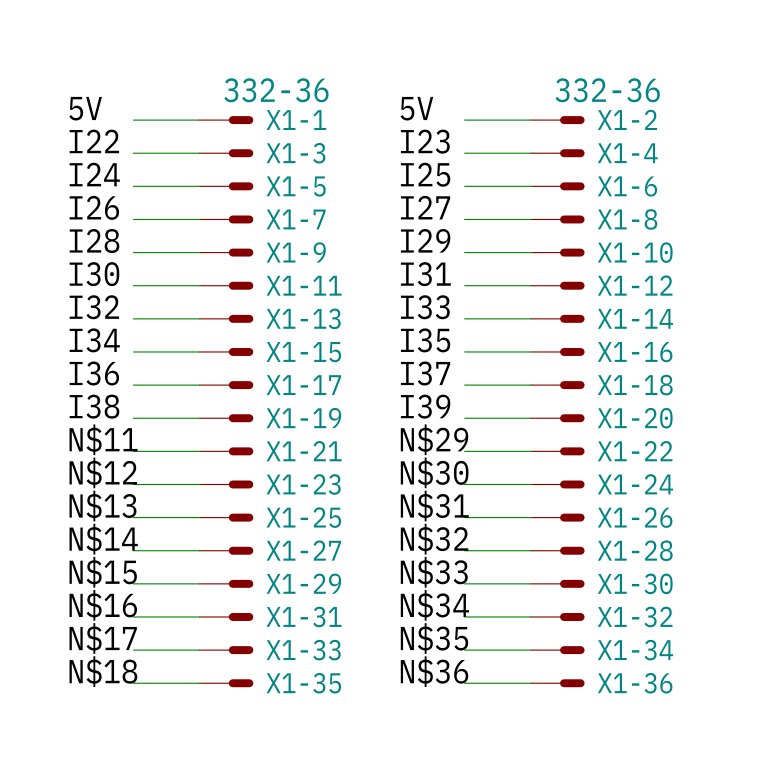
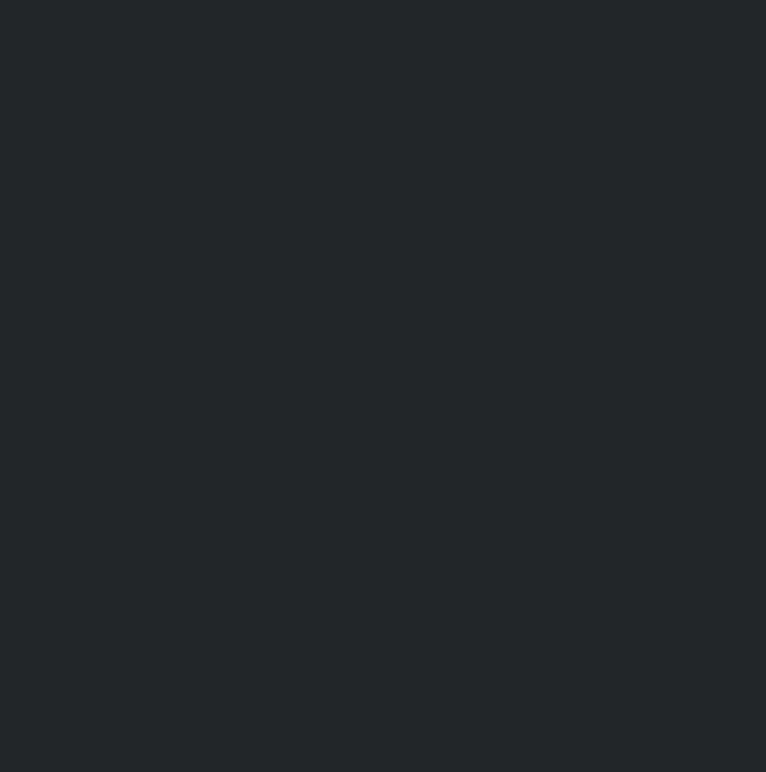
label: 5V (85, 108) -> none
label: 5V (416, 108) -> none
wire: (133, 120) (199, 120) -> none
X1-1: 332-36 (226, 120) -> none
wire: (464, 120) (530, 120) -> none
X1-2: 332-36 (557, 120) -> none
label: I22 (94, 141) -> none
label: I23 (425, 141) -> none
wire: (133, 153) (199, 153) -> none
X1-3: (226, 153) -> none
wire: (464, 153) (530, 153) -> none
X1-4: (557, 153) -> none
label: I24 (94, 174) -> none
label: I25 (425, 174) -> none
wire: (133, 186) (199, 186) -> none
X1-5: (226, 186) -> none
wire: (464, 186) (530, 186) -> none
X1-6: (557, 186) -> none
label: I26 (94, 207) -> none
label: I27 (425, 207) -> none
wire: (133, 219) (199, 219) -> none
X1-7: (226, 219) -> none
wire: (464, 219) (530, 219) -> none
X1-8: (557, 219) -> none
label: I29 (425, 240) -> none
label: I28 (94, 241) -> none
wire: (133, 252) (199, 252) -> none
X1-9: (226, 252) -> none
wire: (464, 252) (530, 252) -> none
X1-10: (557, 252) -> none
label: I30 (94, 274) -> none
label: I31 (425, 274) -> none
wire: (133, 285) (199, 285) -> none
X1-11: (226, 285) -> none
wire: (464, 285) (530, 285) -> none
X1-12: (557, 285) -> none
label: I32 (94, 307) -> none
label: I33 (425, 307) -> none
wire: (133, 318) (199, 318) -> none
X1-13: (226, 318) -> none
wire: (464, 318) (530, 318) -> none
X1-14: (557, 318) -> none
label: I34 (94, 340) -> none
label: I35 (425, 340) -> none
wire: (133, 351) (199, 351) -> none
X1-15: (226, 351) -> none
wire: (464, 351) (530, 351) -> none
X1-16: (557, 351) -> none
label: I36 (94, 373) -> none
label: I37 (425, 373) -> none
wire: (133, 385) (199, 385) -> none
X1-17: (226, 385) -> none
wire: (464, 385) (530, 385) -> none
X1-18: (557, 385) -> none
label: I38 (94, 406) -> none
label: I39 (425, 406) -> none
wire: (133, 418) (199, 418) -> none
X1-19: (226, 418) -> none
wire: (464, 418) (530, 418) -> none
X1-20: (557, 418) -> none
label: N$11 (103, 439) -> none
label: N$29 (434, 439) -> none
wire: (133, 451) (199, 451) -> none
X1-21: (226, 451) -> none
wire: (464, 451) (530, 451) -> none
X1-22: (557, 451) -> none
label: N$12 (103, 472) -> none
label: N$30 (434, 472) -> none
wire: (133, 484) (199, 484) -> none
X1-23: (226, 484) -> none
wire: (464, 484) (530, 484) -> none
X1-24: (557, 484) -> none
label: N$13 (102, 506) -> none
label: N$31 (434, 506) -> none
wire: (133, 517) (199, 517) -> none
X1-25: (226, 517) -> none
wire: (464, 517) (530, 517) -> none
X1-26: (557, 517) -> none
label: N$14 (103, 539) -> none
label: N$32 (434, 539) -> none
wire: (133, 550) (199, 550) -> none
X1-27: (226, 550) -> none
wire: (464, 550) (530, 550) -> none
X1-28: (557, 550) -> none
label: N$15 (103, 572) -> none
label: N$33 (434, 572) -> none
wire: (133, 583) (199, 583) -> none
X1-29: (226, 583) -> none
wire: (464, 583) (530, 583) -> none
X1-30: (557, 583) -> none
label: N$16 (103, 605) -> none
label: N$34 (434, 605) -> none
wire: (133, 616) (199, 616) -> none
X1-31: (226, 616) -> none
wire: (464, 616) (530, 616) -> none
X1-32: (557, 616) -> none
label: N$17 (103, 638) -> none
label: N$35 (434, 638) -> none
wire: (133, 650) (199, 650) -> none
X1-33: (226, 650) -> none
wire: (464, 650) (530, 650) -> none
X1-34: (557, 650) -> none
label: N$18 (103, 671) -> none
label: N$36 (434, 671) -> none
wire: (133, 683) (199, 683) -> none
X1-35: (226, 683) -> none
wire: (464, 683) (530, 683) -> none
X1-36: (557, 683) -> none

